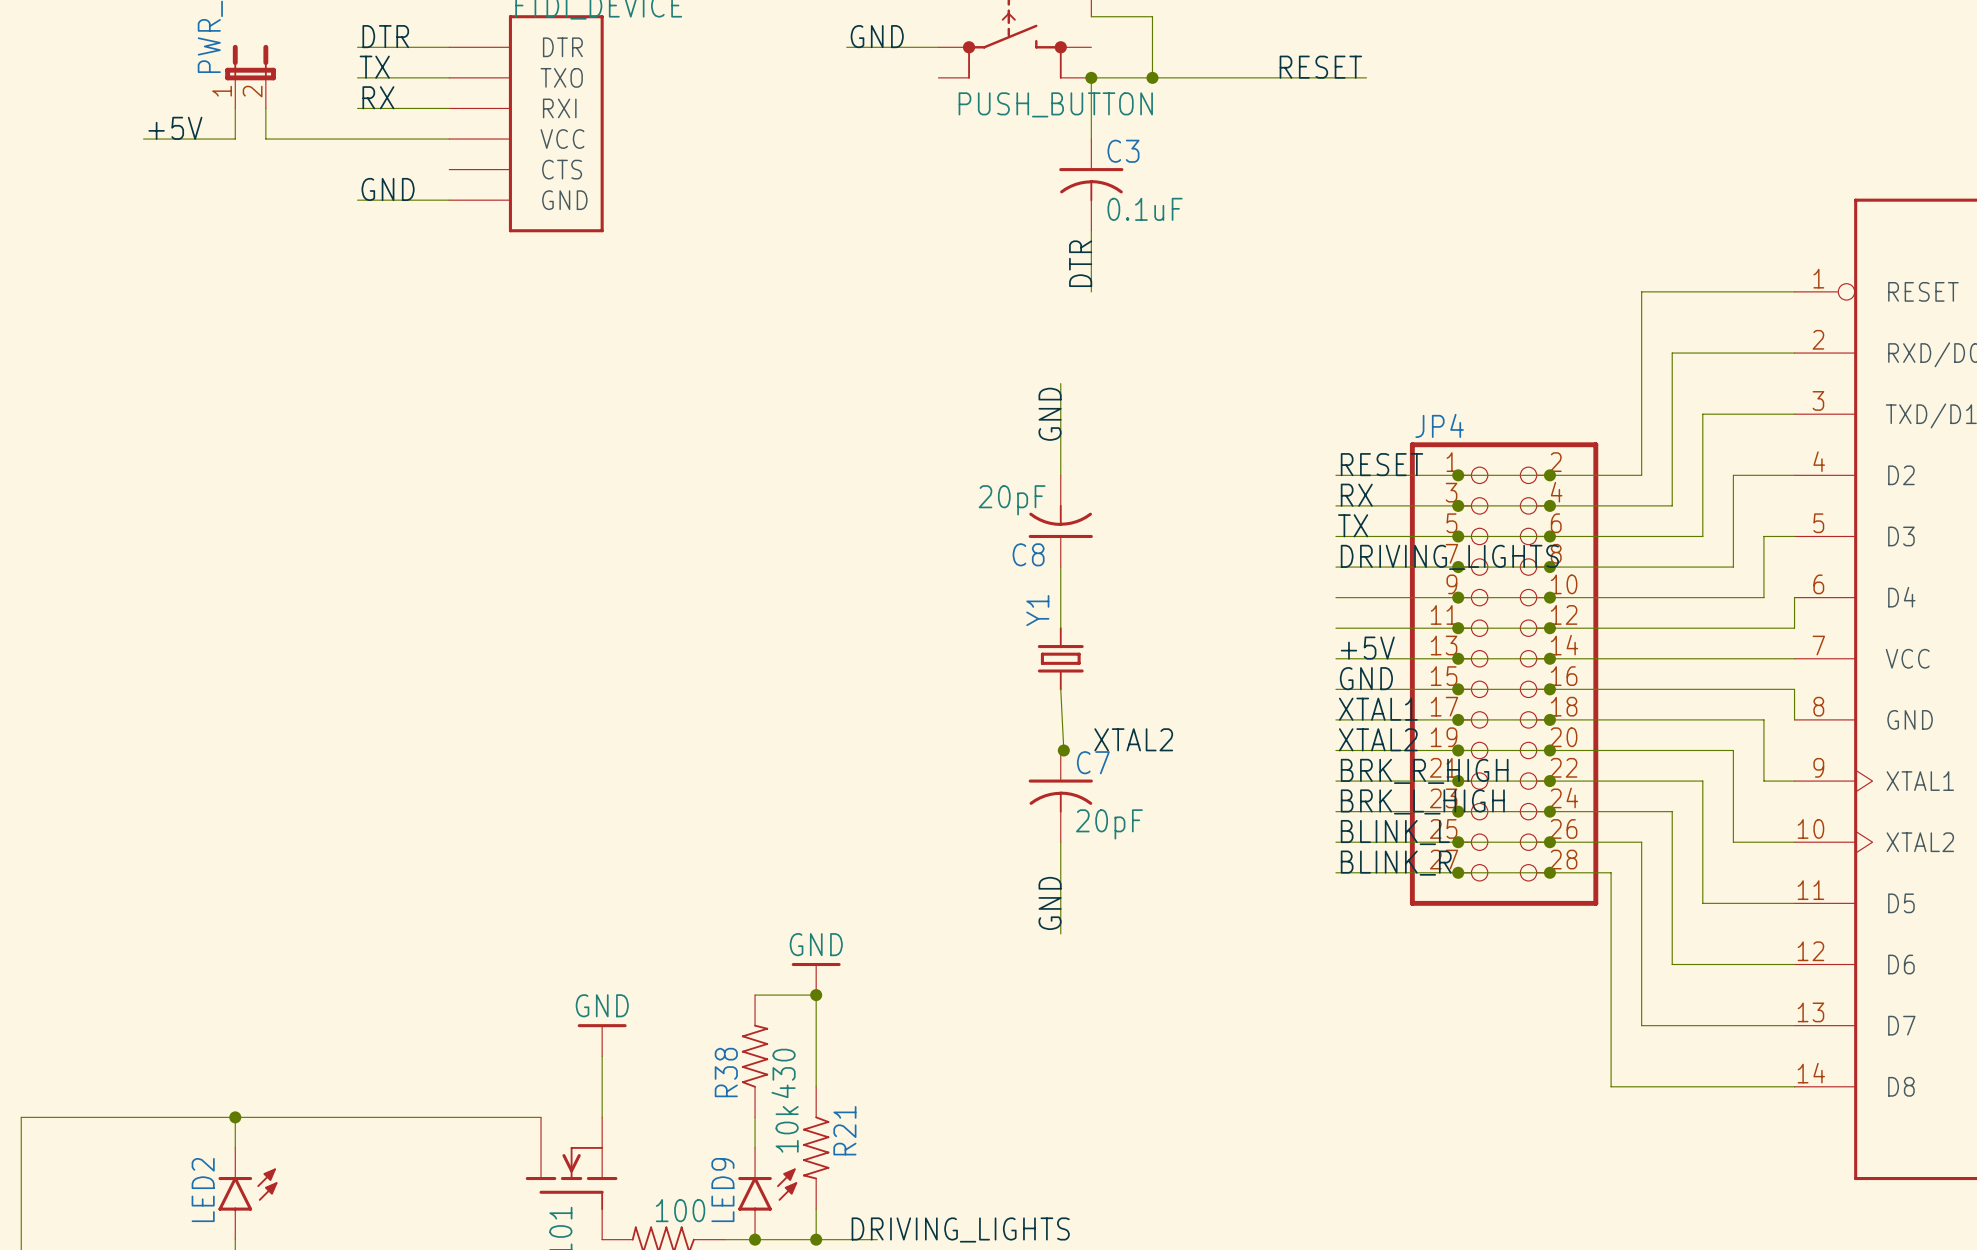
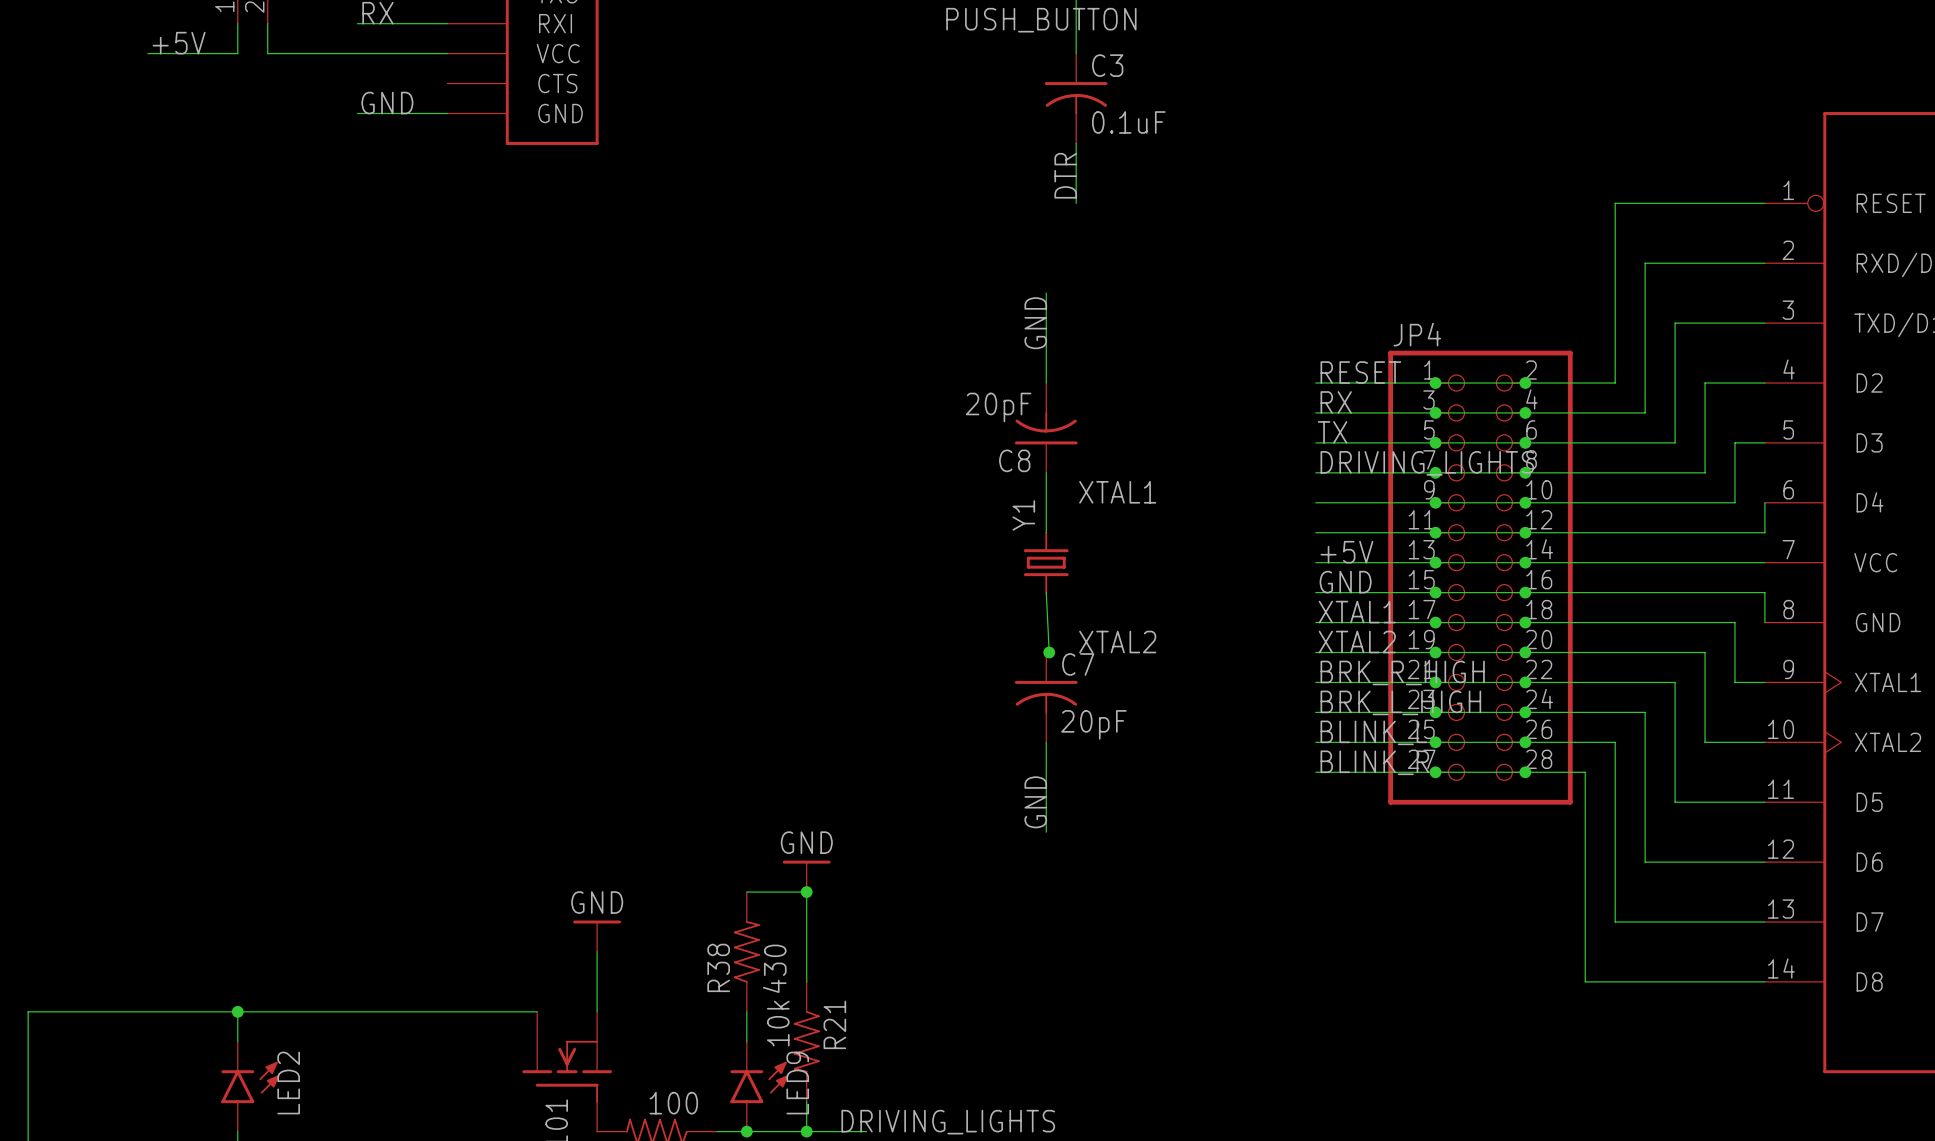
label: none -> XTAL1 (1117, 492)
LED2 name position: LED2 (203, 1190) -> LED2 (288, 1083)
LED9 name position: LED9 (722, 1190) -> LED9 (797, 1083)

